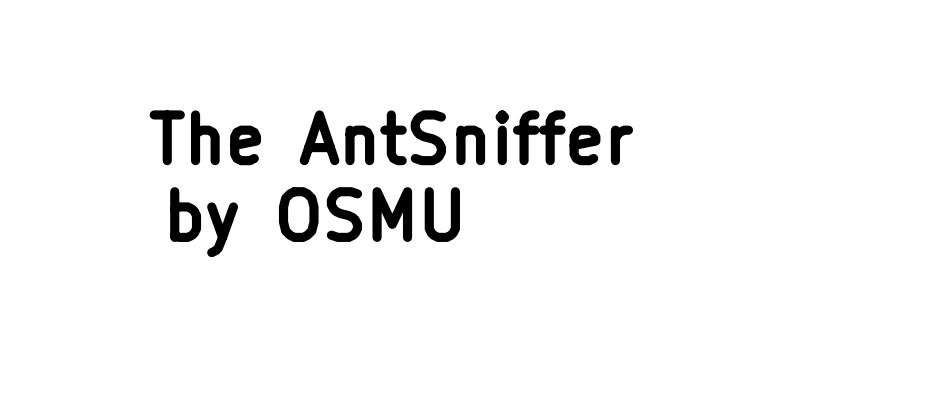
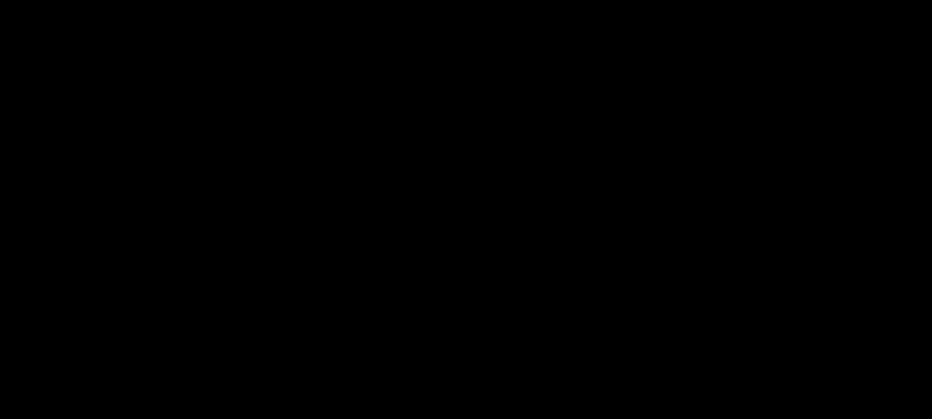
text: The AntSniffer (391, 137) -> none
text: by OSMU (315, 222) -> none

